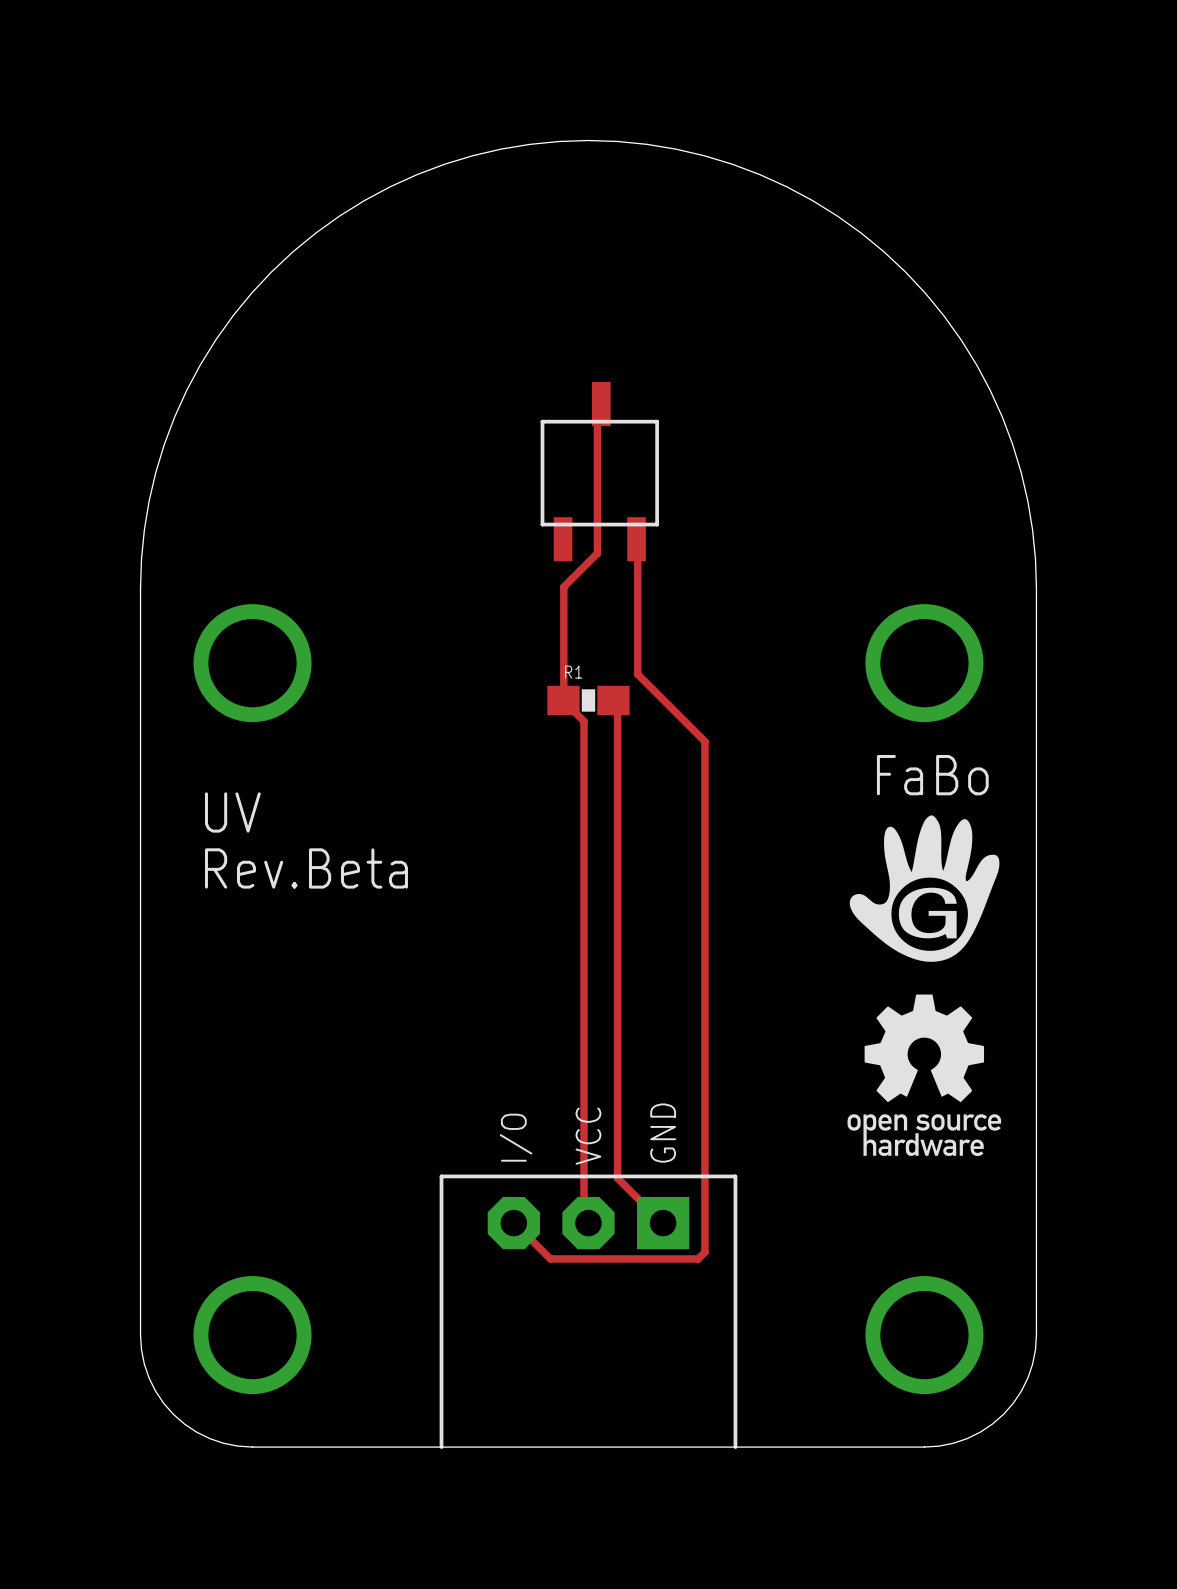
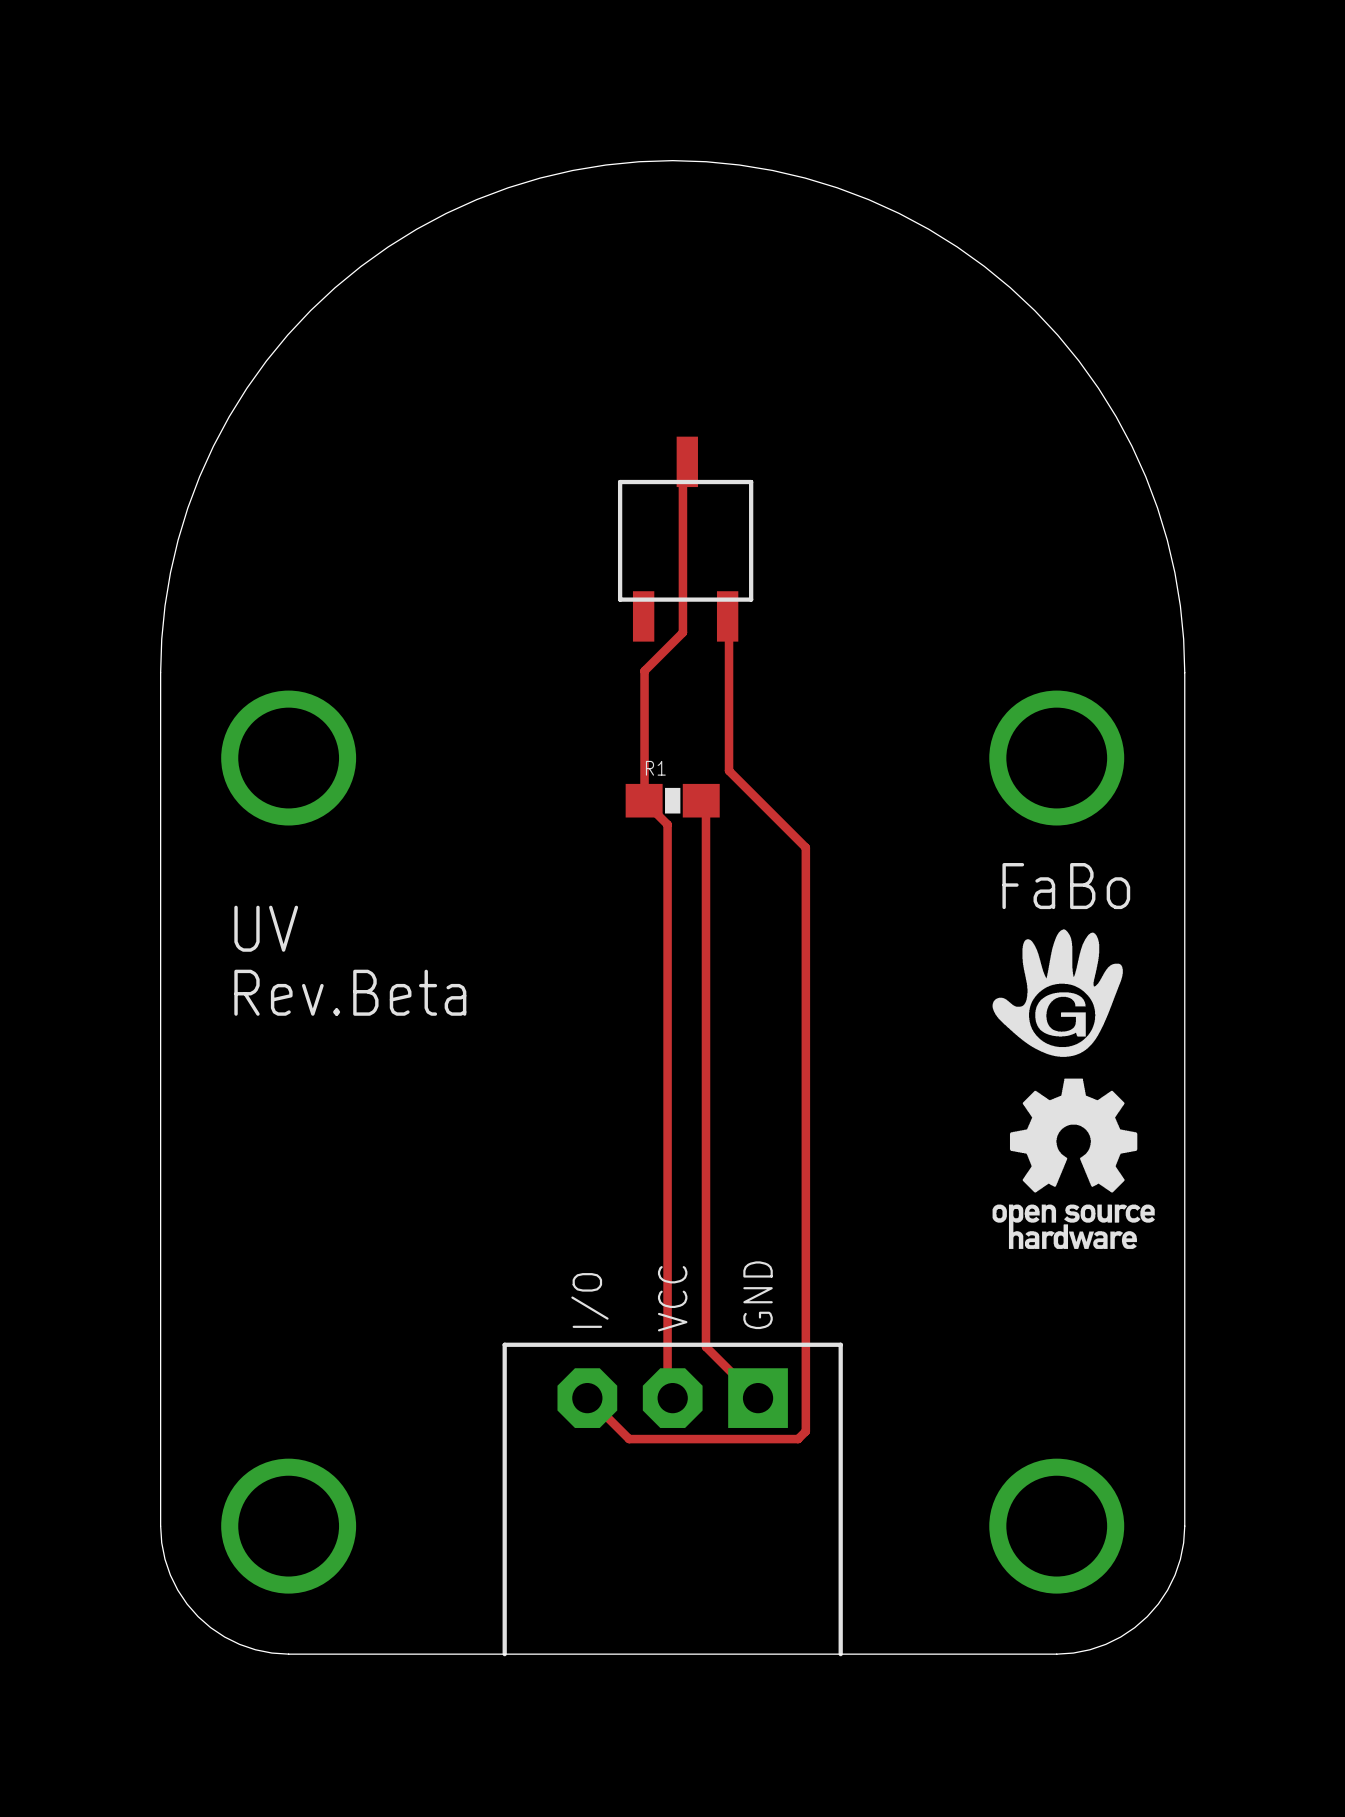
drawing shape: [849, 815, 1000, 962] -> [992, 929, 1123, 1057]
drawing: none -> [992, 1078, 1155, 1249]
drawing: [847, 994, 1002, 1156] -> none

